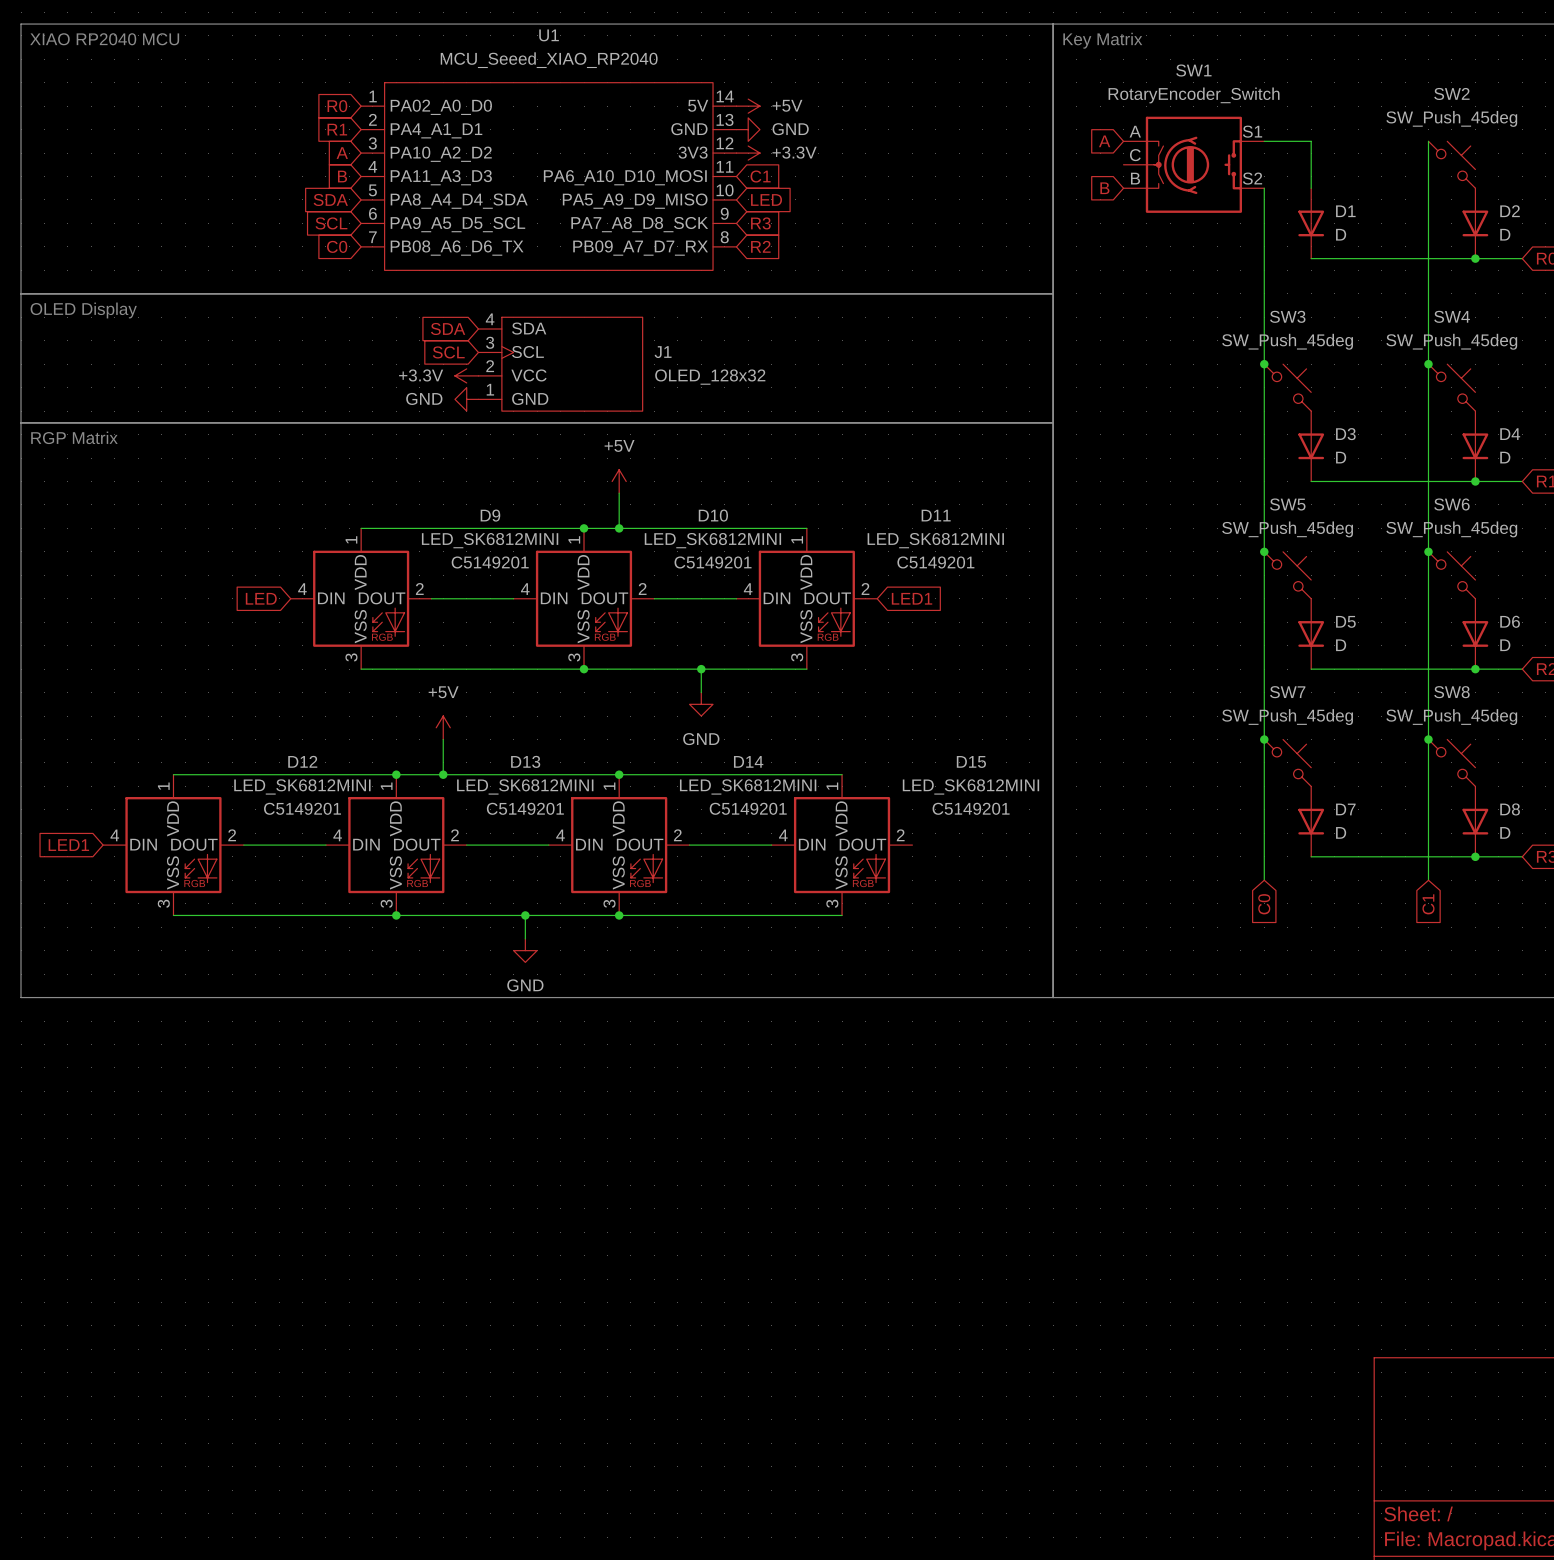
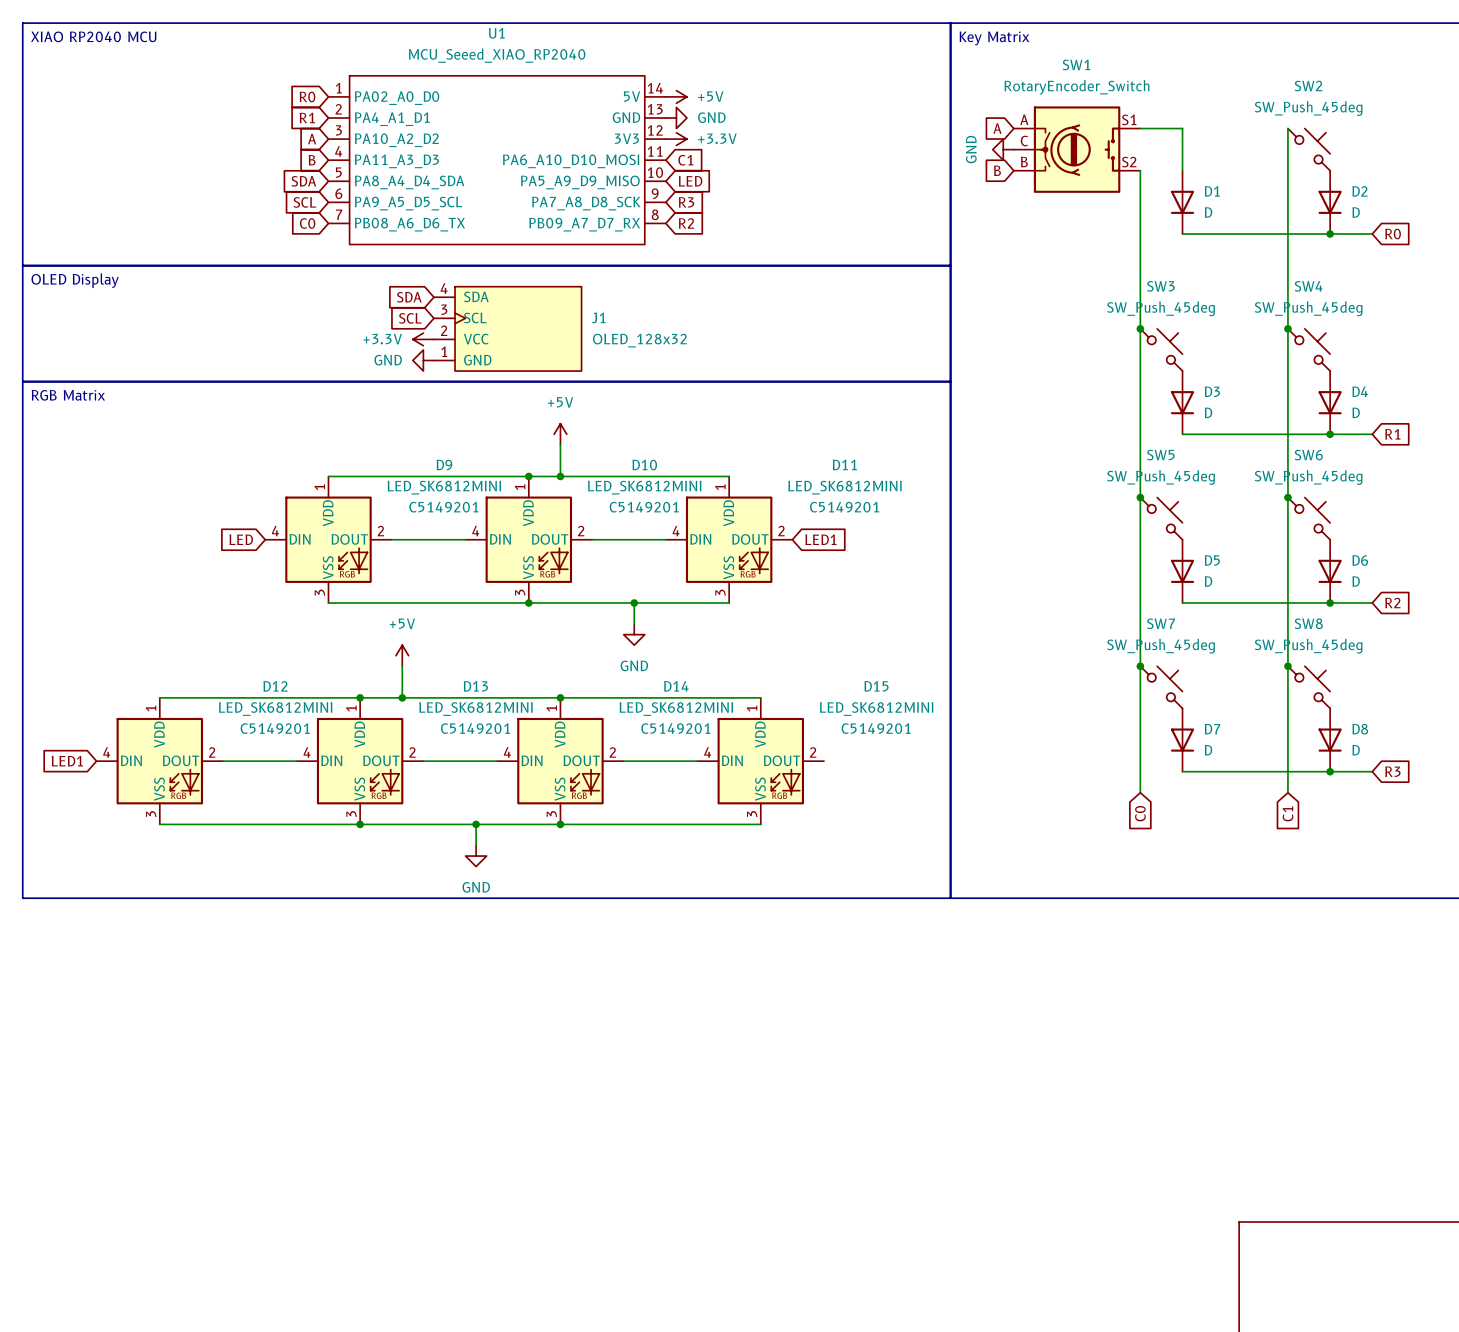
power symbol: none -> GND (1003, 149)
text: RGP Matrix (74, 437) -> RGB Matrix (68, 395)

